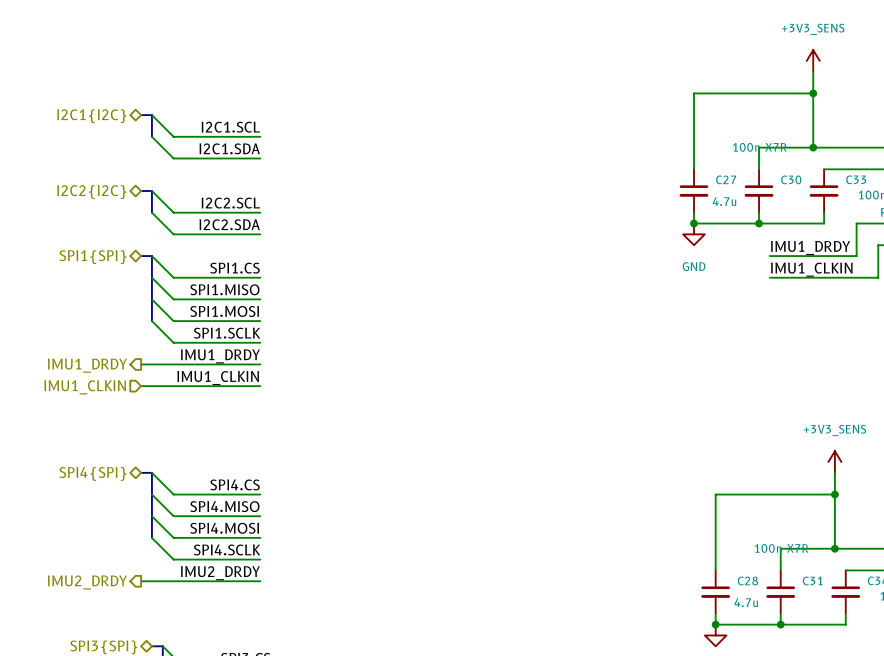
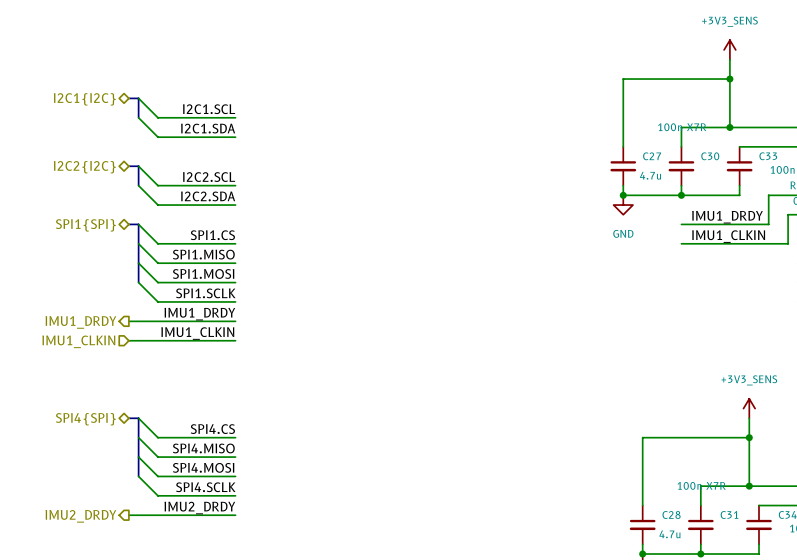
wire: none -> (681, 224) (691, 224)
wire: none -> (681, 243) (691, 243)

